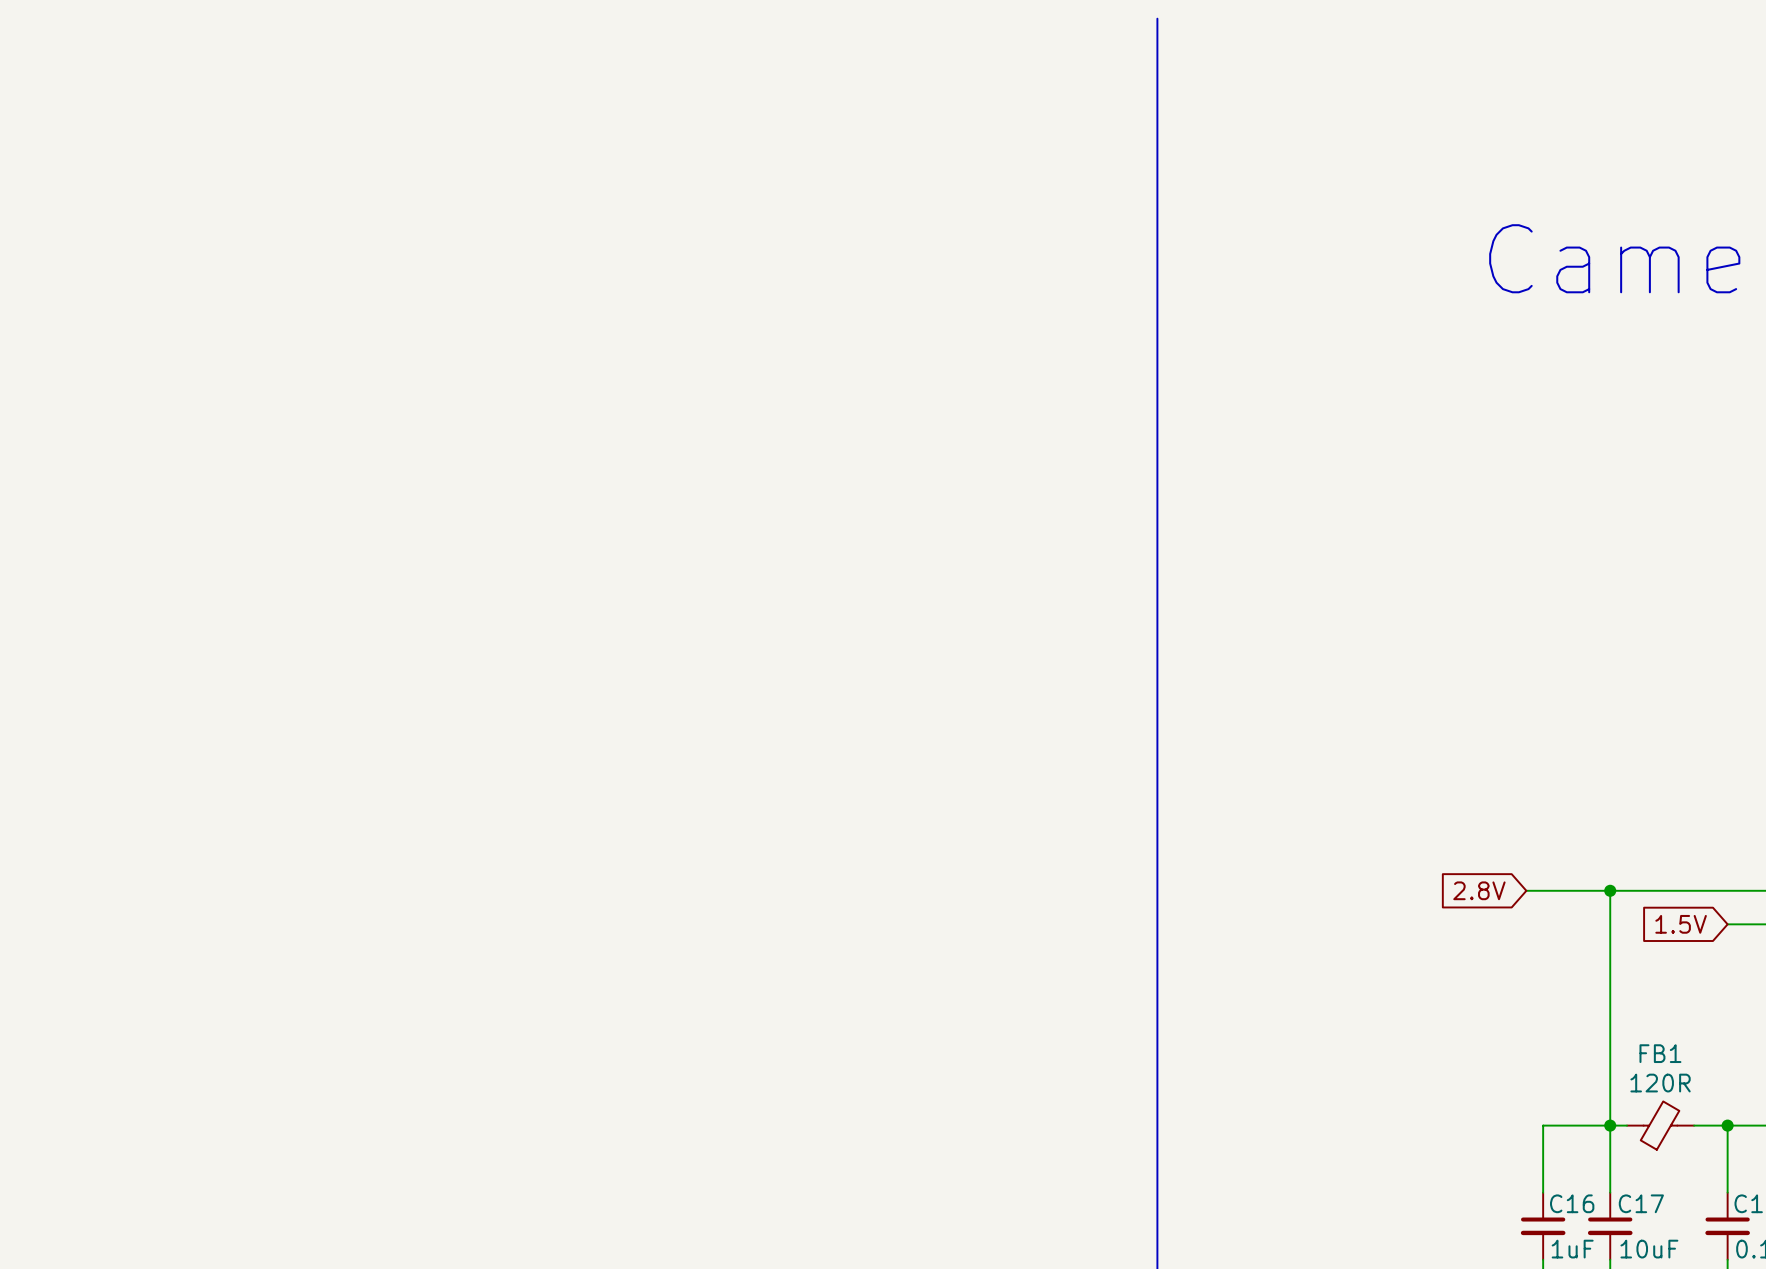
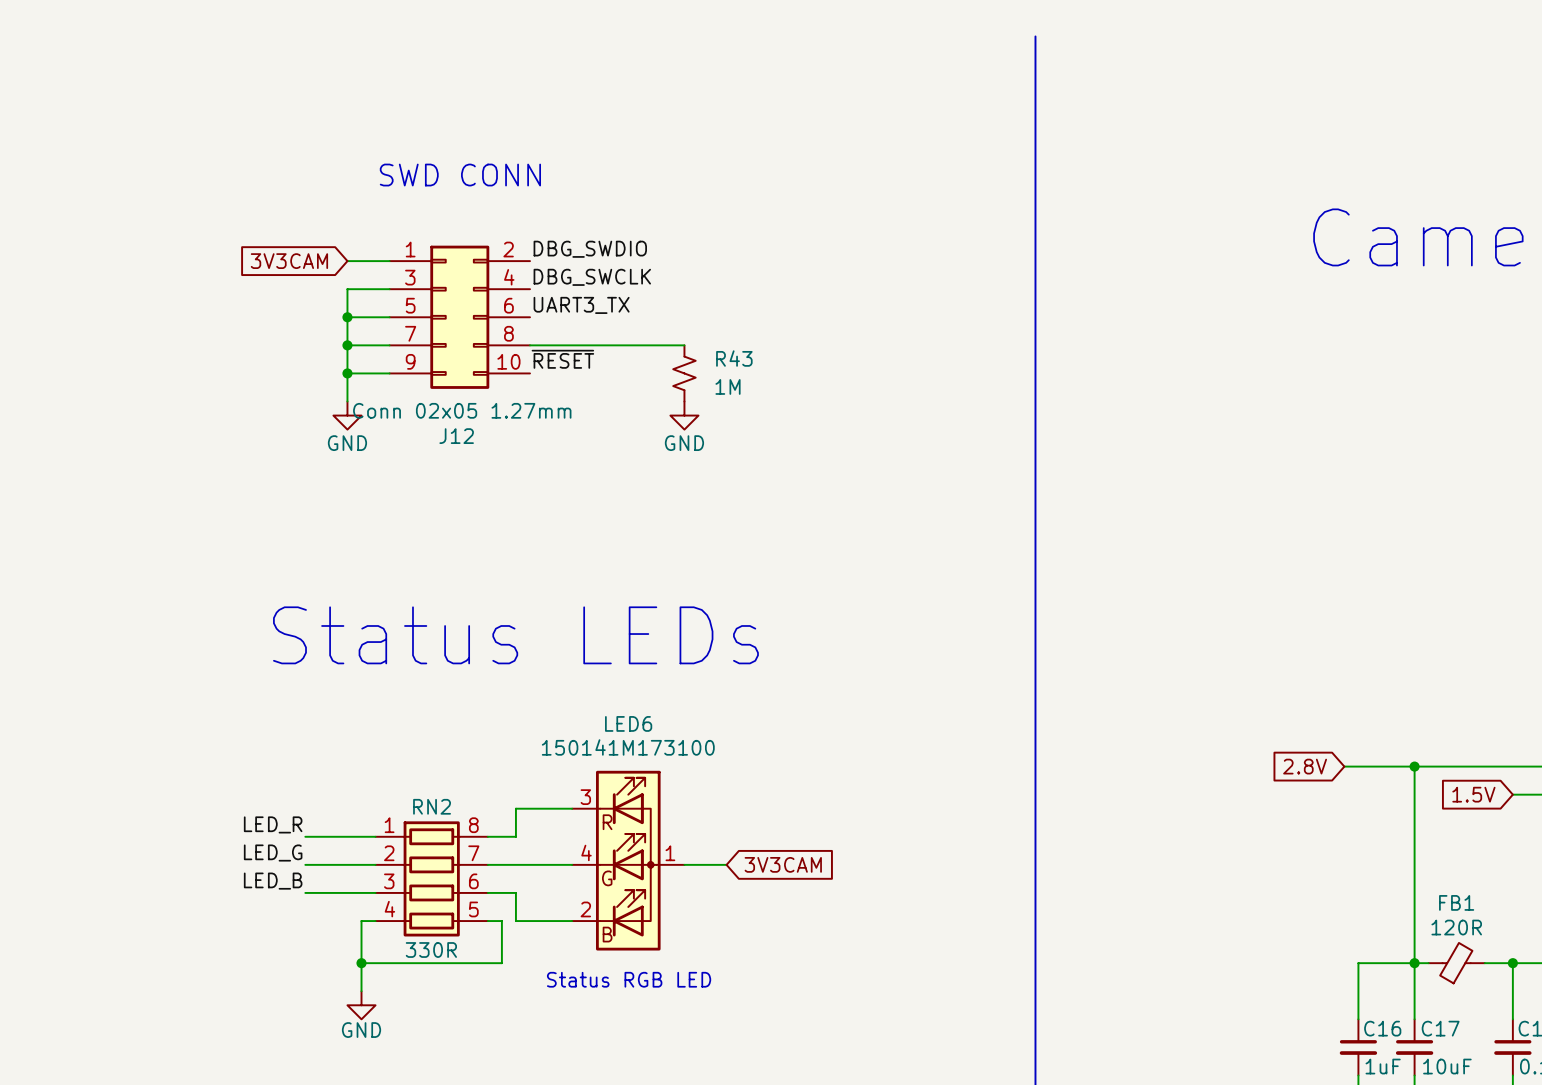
text: none -> SWD CONN (460, 175)
label: none -> DBG_SWDIO (590, 249)
global label: none -> 3V3CAM (289, 261)
wire: none -> (347, 261) (389, 261)
label: none -> DBG_SWCLK (592, 277)
wire: none -> (389, 289) (347, 289) (347, 401)
label: none -> UART3_TX (581, 305)
wire: none -> (347, 317) (389, 317)
junction: none -> (347, 317)
J12: none -> Conn 02x05 1.27mm (459, 317)
wire: none -> (347, 345) (389, 345)
junction: none -> (347, 345)
wire: none -> (530, 345) (684, 345)
label: none -> ~{RESET} (562, 359)
wire: none -> (347, 373) (389, 373)
junction: none -> (347, 373)
R43: none -> 1M (684, 373)
power symbol: none -> GND (347, 415)
power symbol: none -> GND (684, 415)
text: none -> Status LEDs (515, 635)
wire: none -> (572, 808) (515, 808) (515, 836) (487, 836)
label: none -> LED_R (273, 824)
wire: none -> (305, 836) (375, 836)
label: none -> LED_G (273, 853)
LED6: none -> 150141M173100 (628, 860)
wire: none -> (305, 864) (375, 864)
wire: none -> (487, 864) (572, 864)
wire: none -> (684, 864) (726, 864)
global label: none -> 3V3CAM (783, 864)
RN2: none -> 330R (431, 878)
label: none -> LED_B (273, 881)
wire: none -> (305, 892) (375, 892)
wire: none -> (487, 892) (515, 892) (515, 921) (572, 921)
wire: none -> (375, 921) (361, 921) (361, 991)
wire: none -> (487, 921) (501, 921) (501, 963) (361, 963)
junction: none -> (361, 963)
text: none -> Status RGB LED (629, 979)
power symbol: none -> GND (361, 1005)

